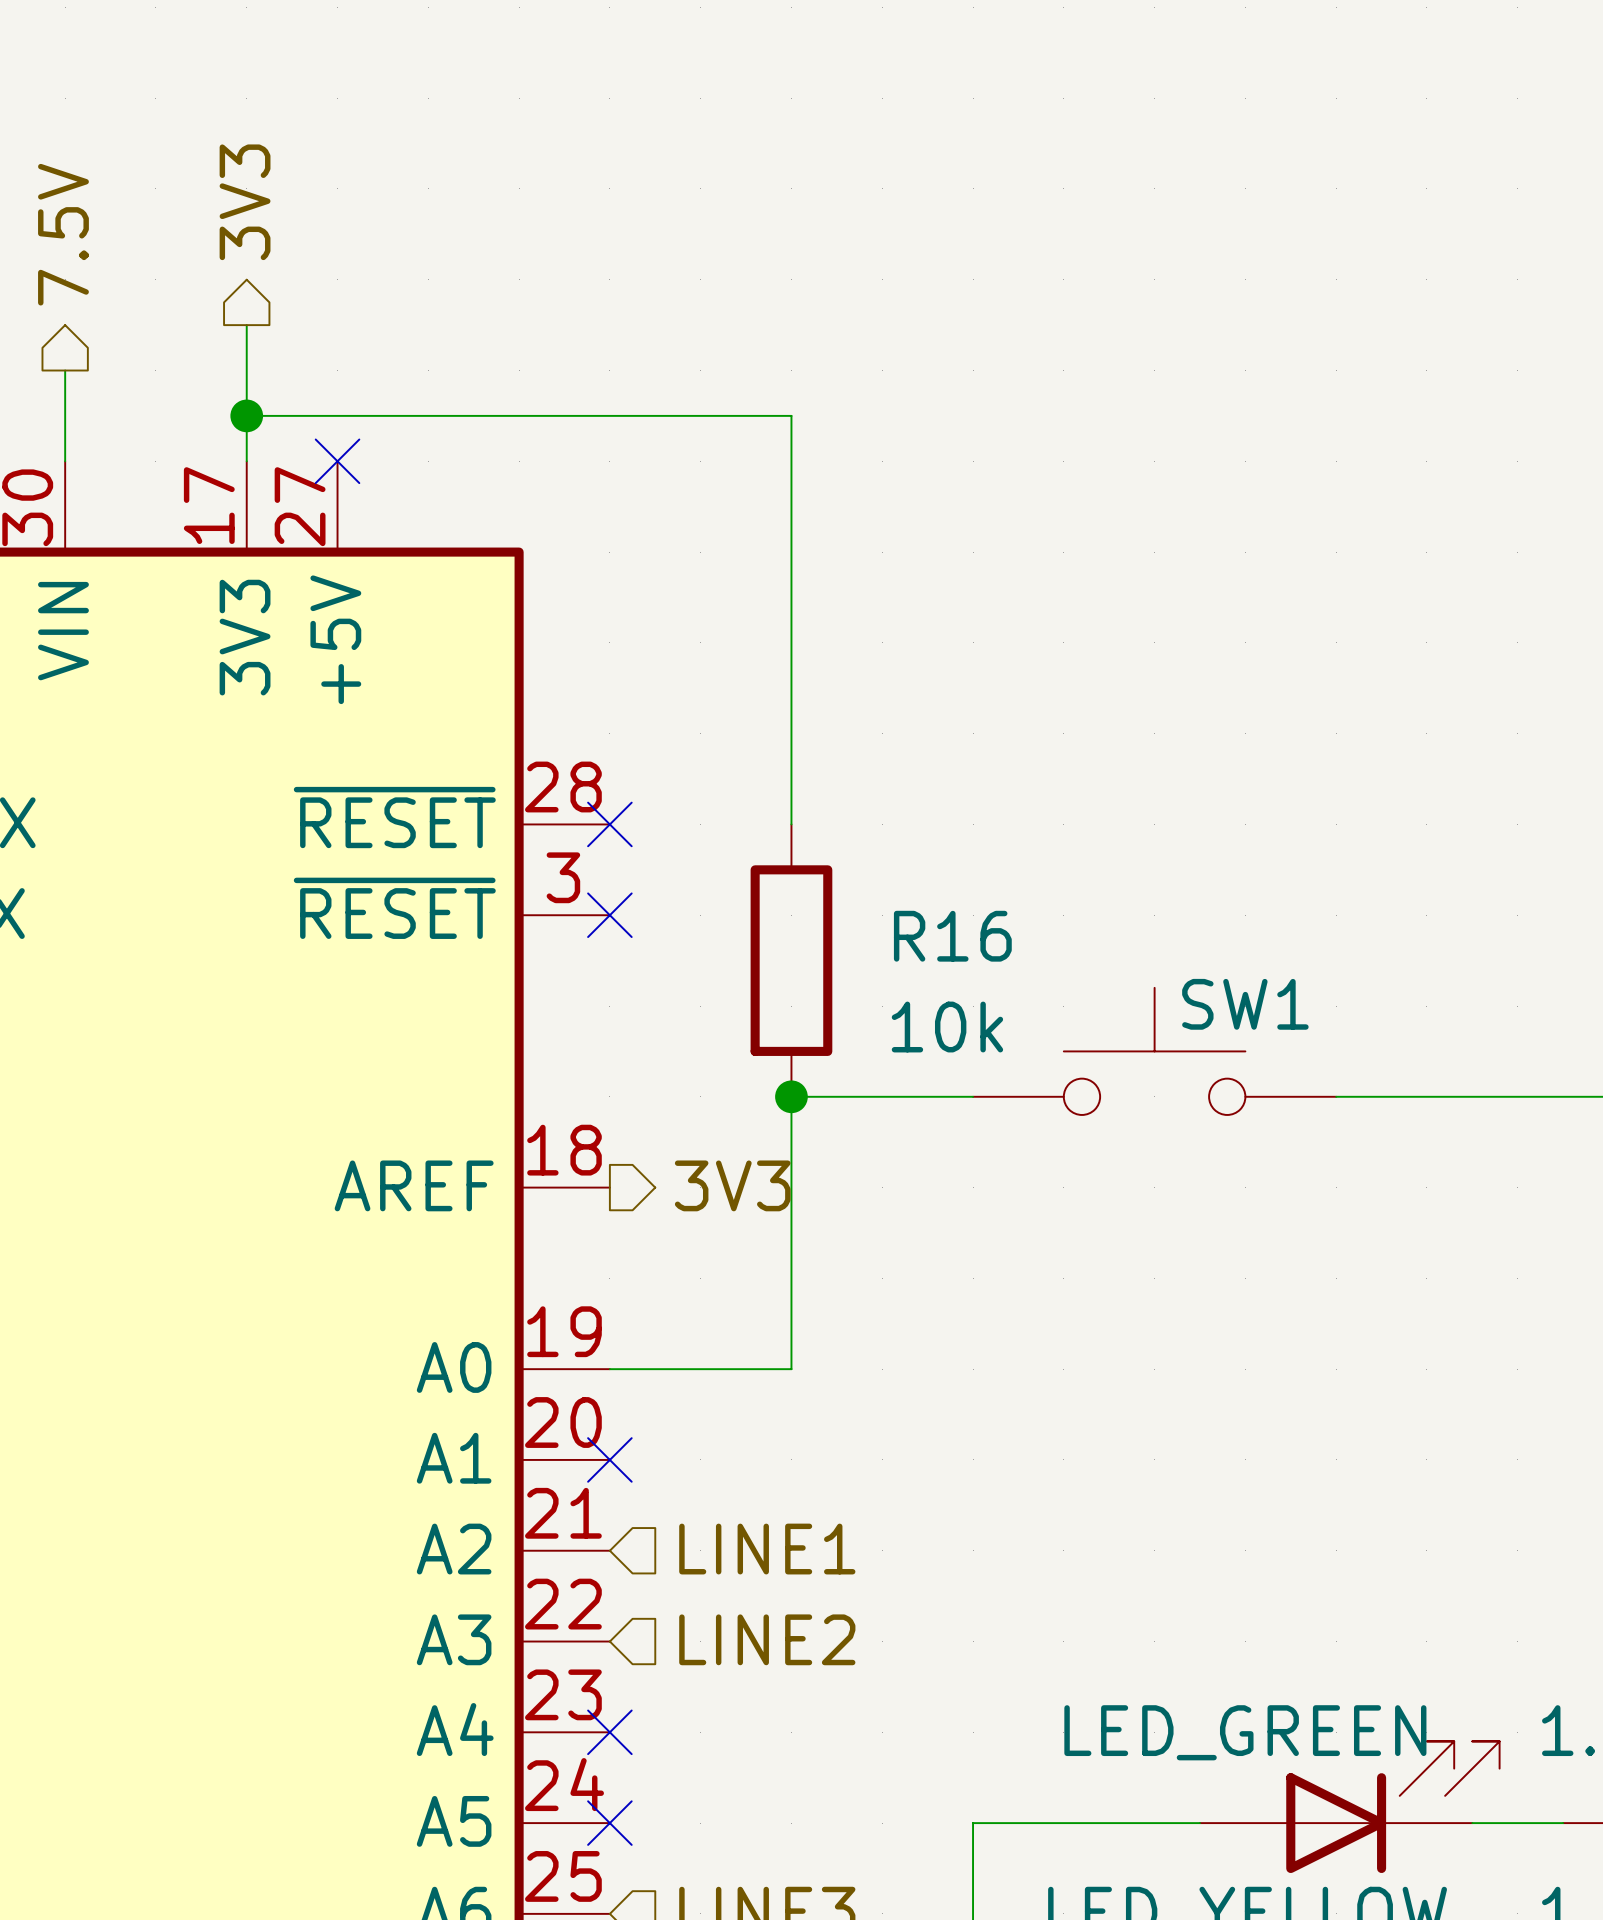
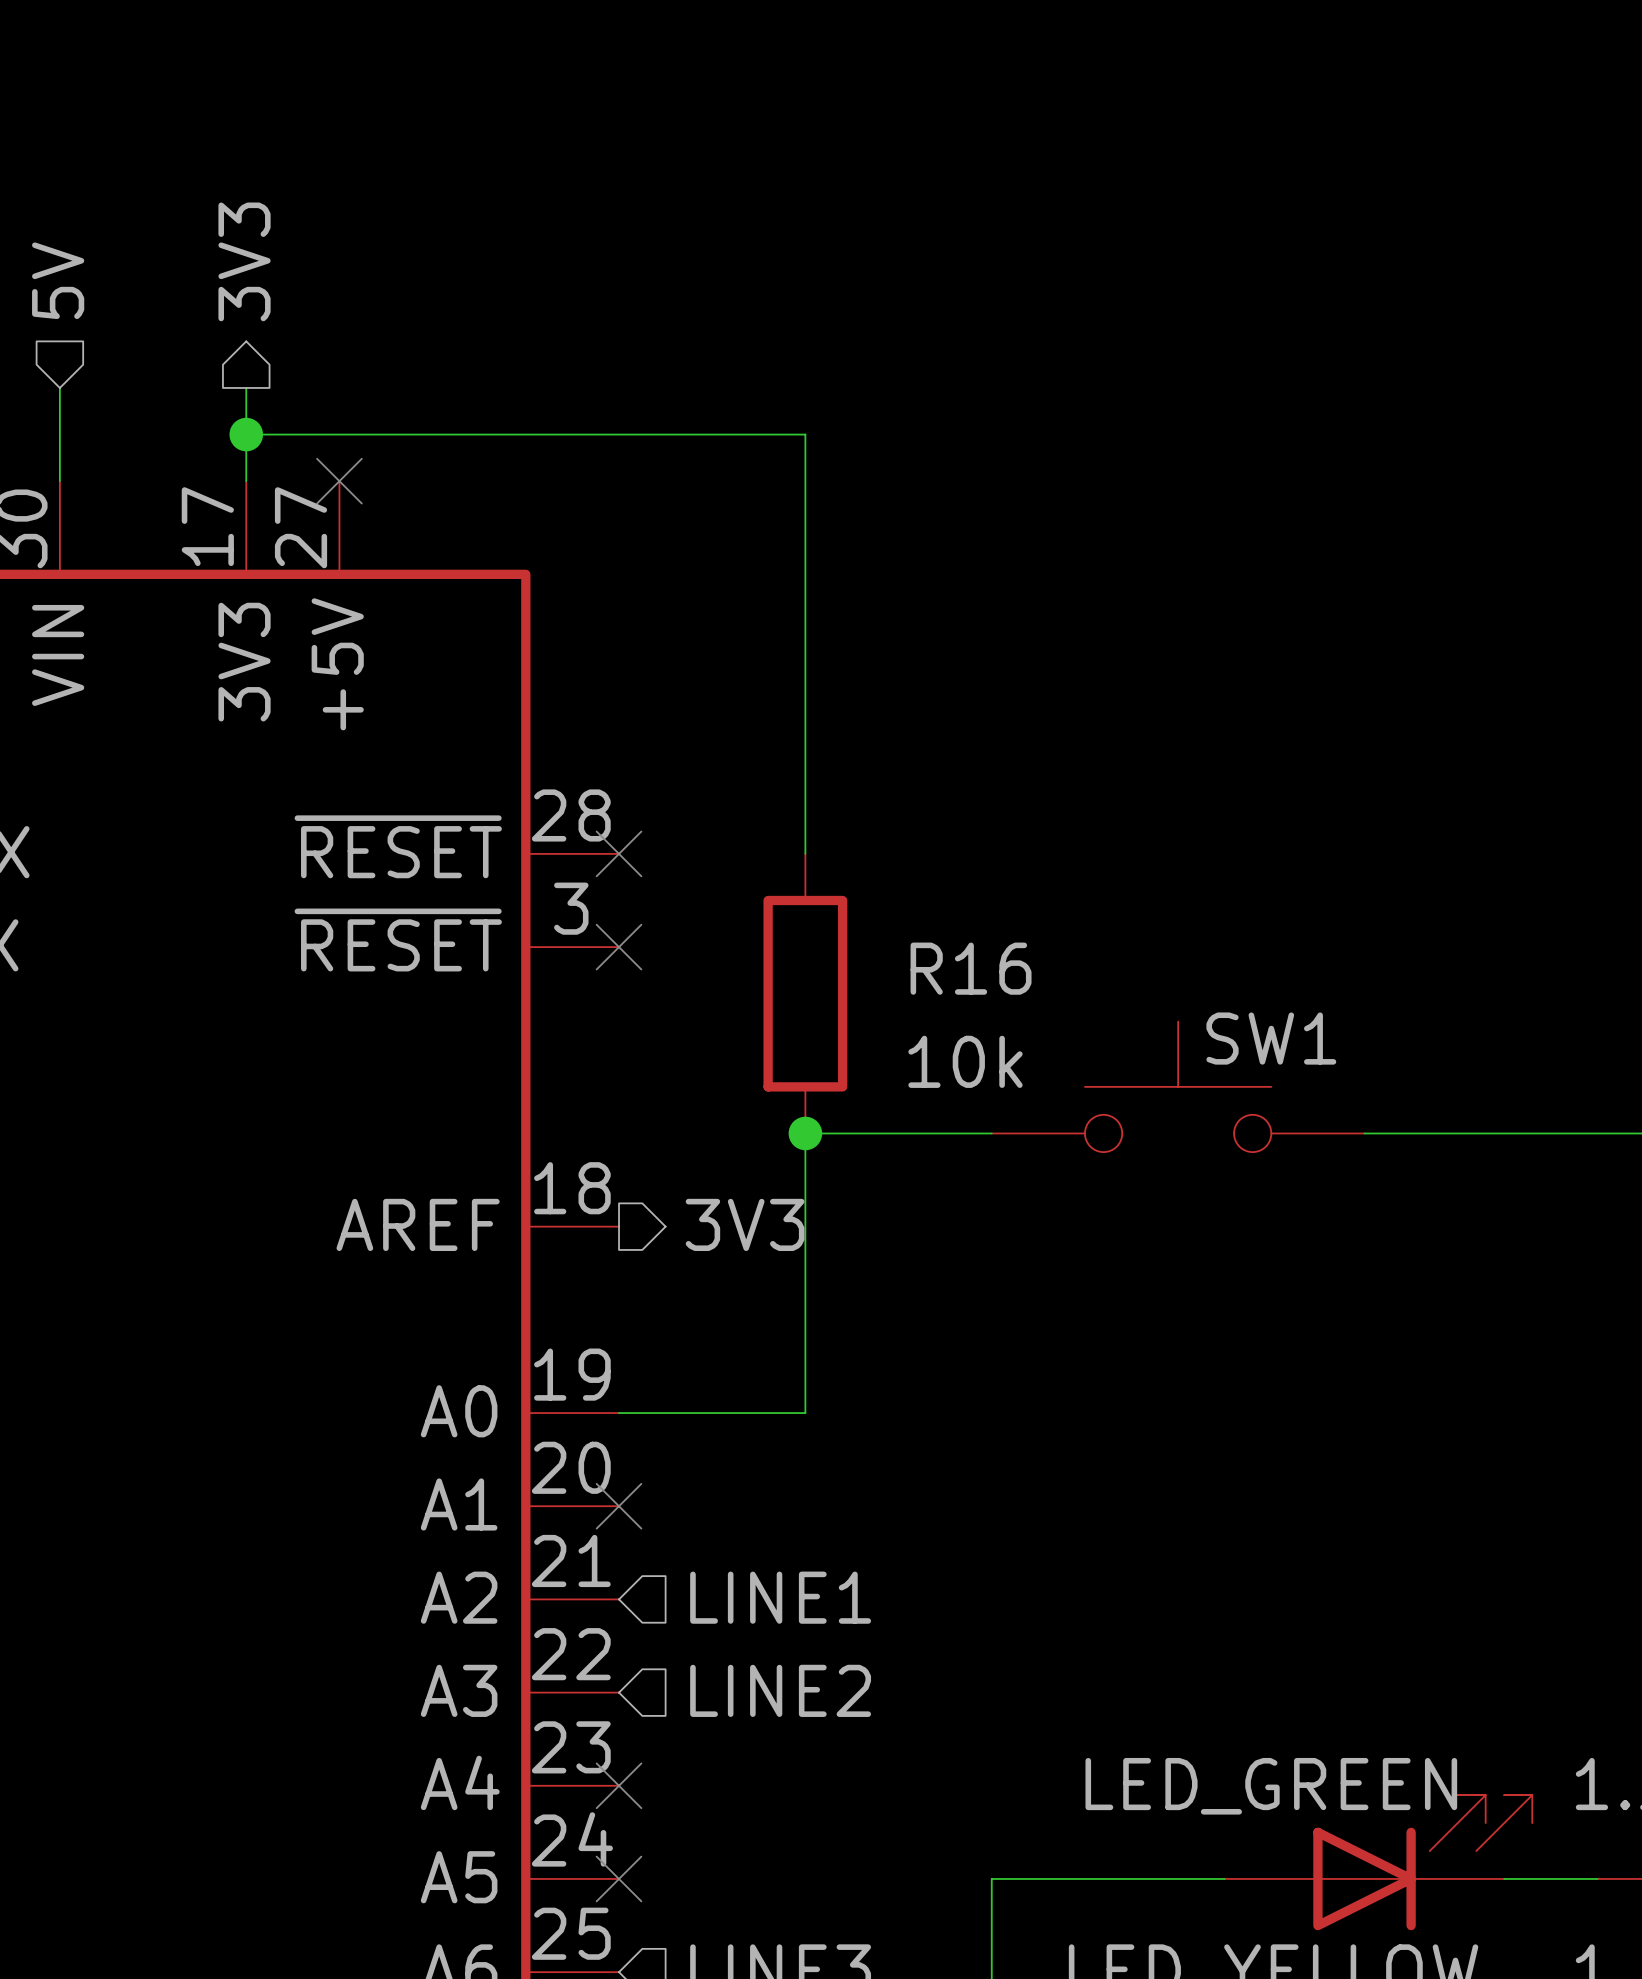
hierarchical label position: 3V3 (245, 202) -> 3V3 (244, 261)
hierarchical label shape: output (63, 234) -> input (58, 280)
hierarchical label: 7.5V (63, 234) -> 5V (58, 280)
wire: (246, 325) (246, 370) -> none

